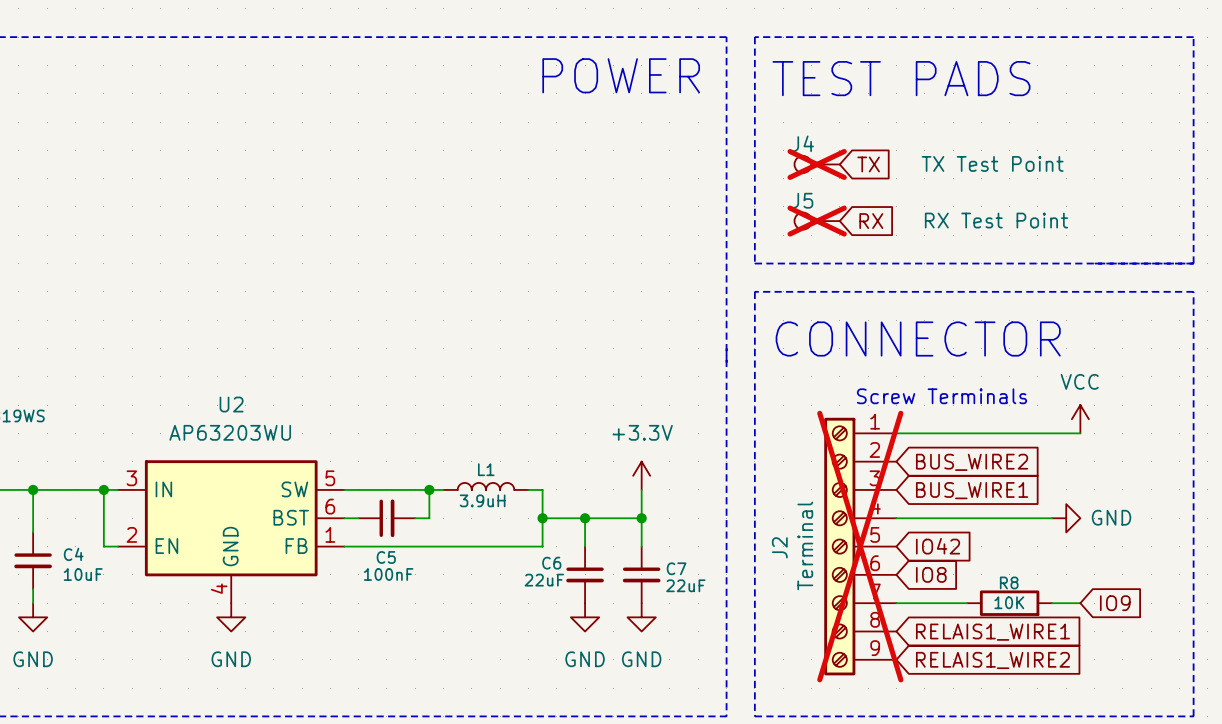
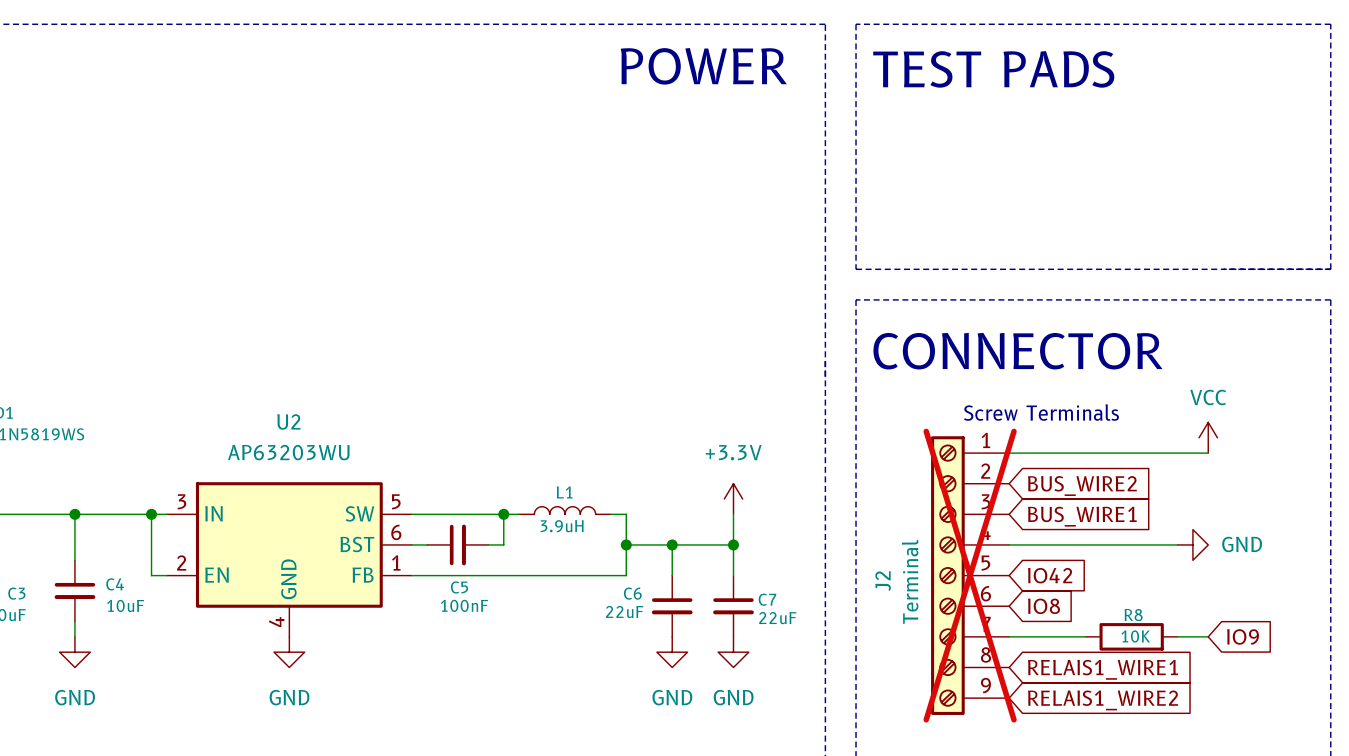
J4: TX Test Point (817, 164) -> none
global label: TX (868, 164) -> none
J5: RX Test Point (817, 221) -> none
global label: RX (871, 221) -> none

